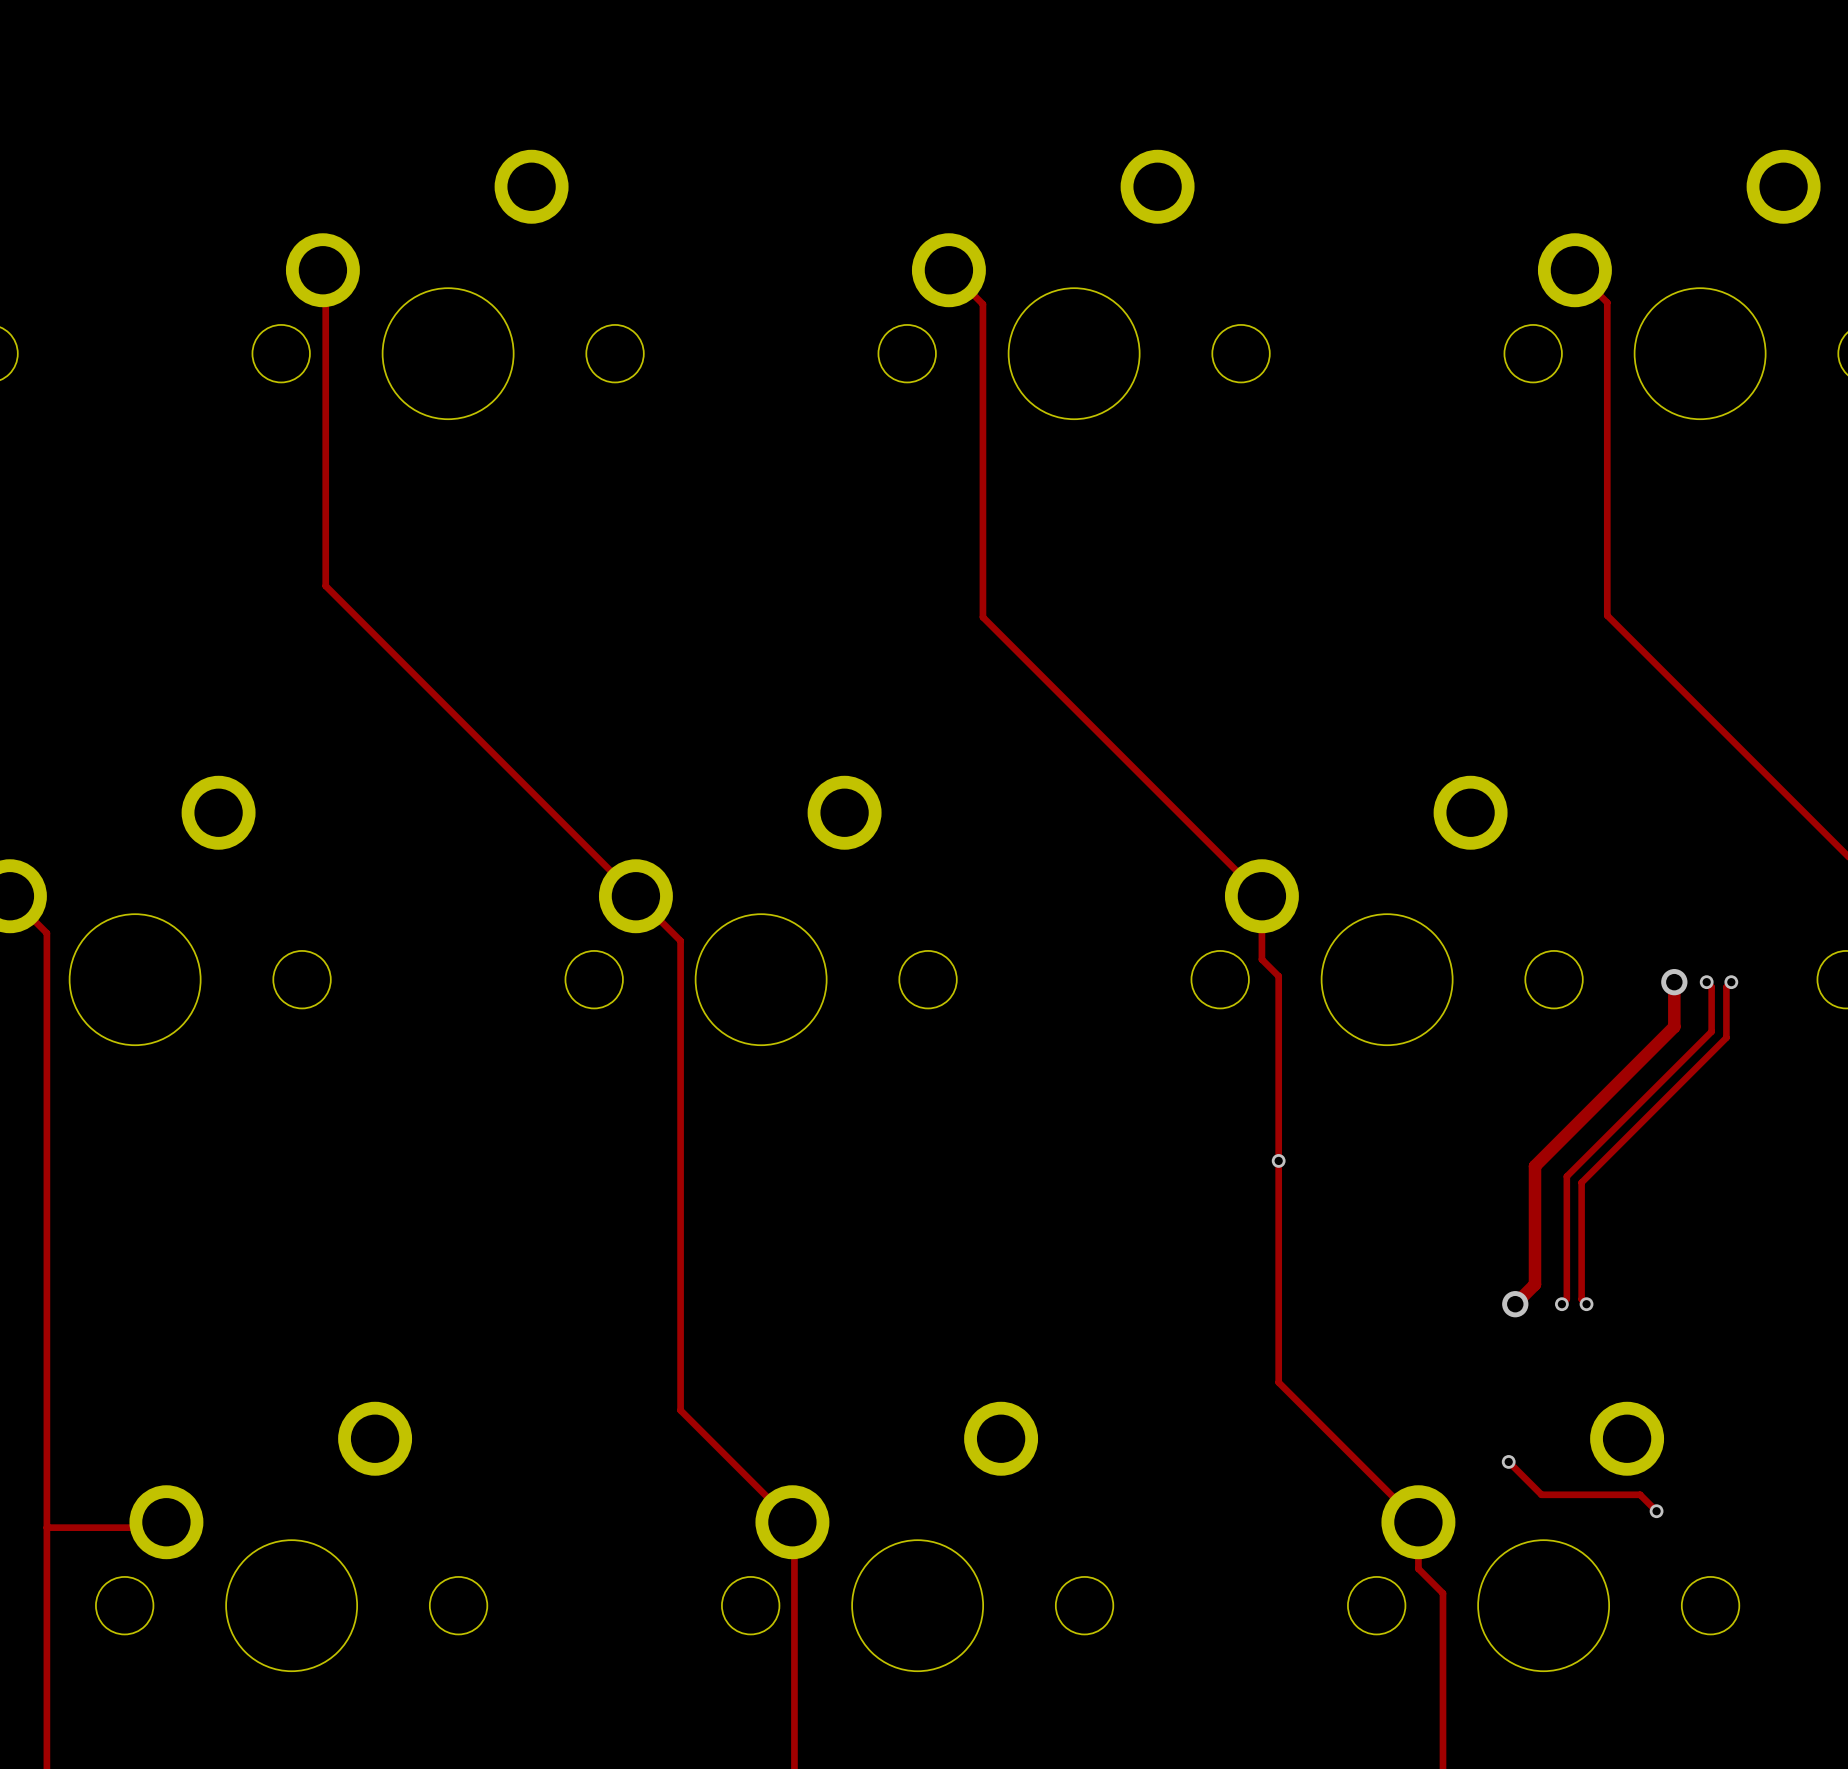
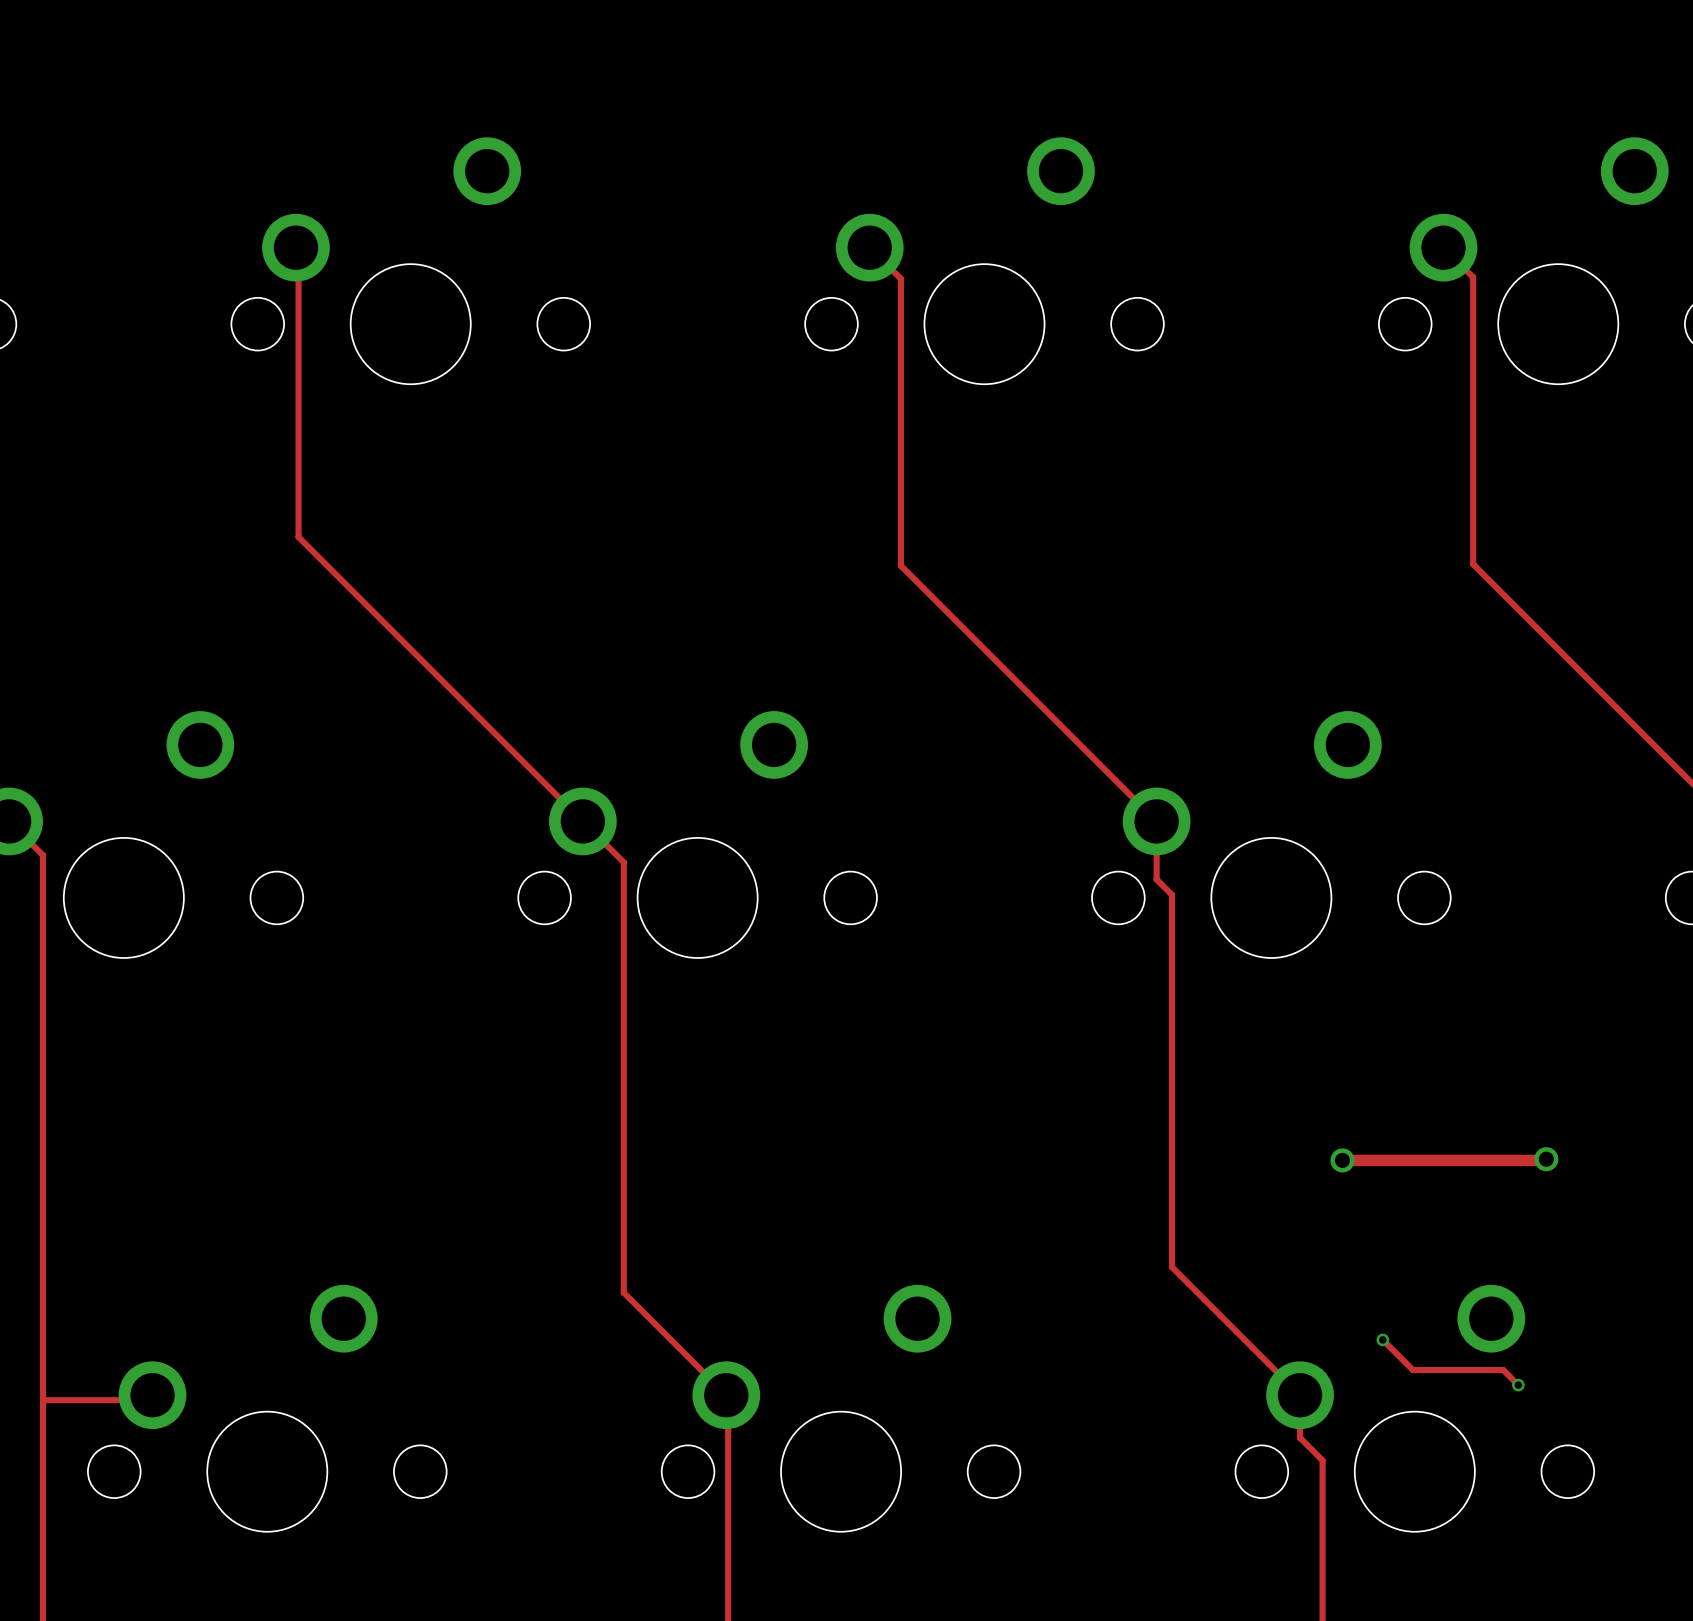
track: (1674, 982) (1674, 1026) (1534, 1166) (1534, 1284) (1515, 1304) -> none
via: (1674, 982) -> none
track: (1706, 982) (1711, 987) (1711, 1031) (1566, 1176) (1566, 1299) (1561, 1304) -> none
via: (1706, 982) -> none
track: (1731, 982) (1726, 987) (1726, 1037) (1581, 1182) (1581, 1299) (1586, 1304) -> none
via: (1731, 982) -> none
via: (1278, 1160) -> none
track: none -> (1546, 1159) (1342, 1160)
via: none -> (1546, 1159)
via position: (1515, 1304) -> (1342, 1160)
via: (1561, 1304) -> none
via: (1586, 1304) -> none

